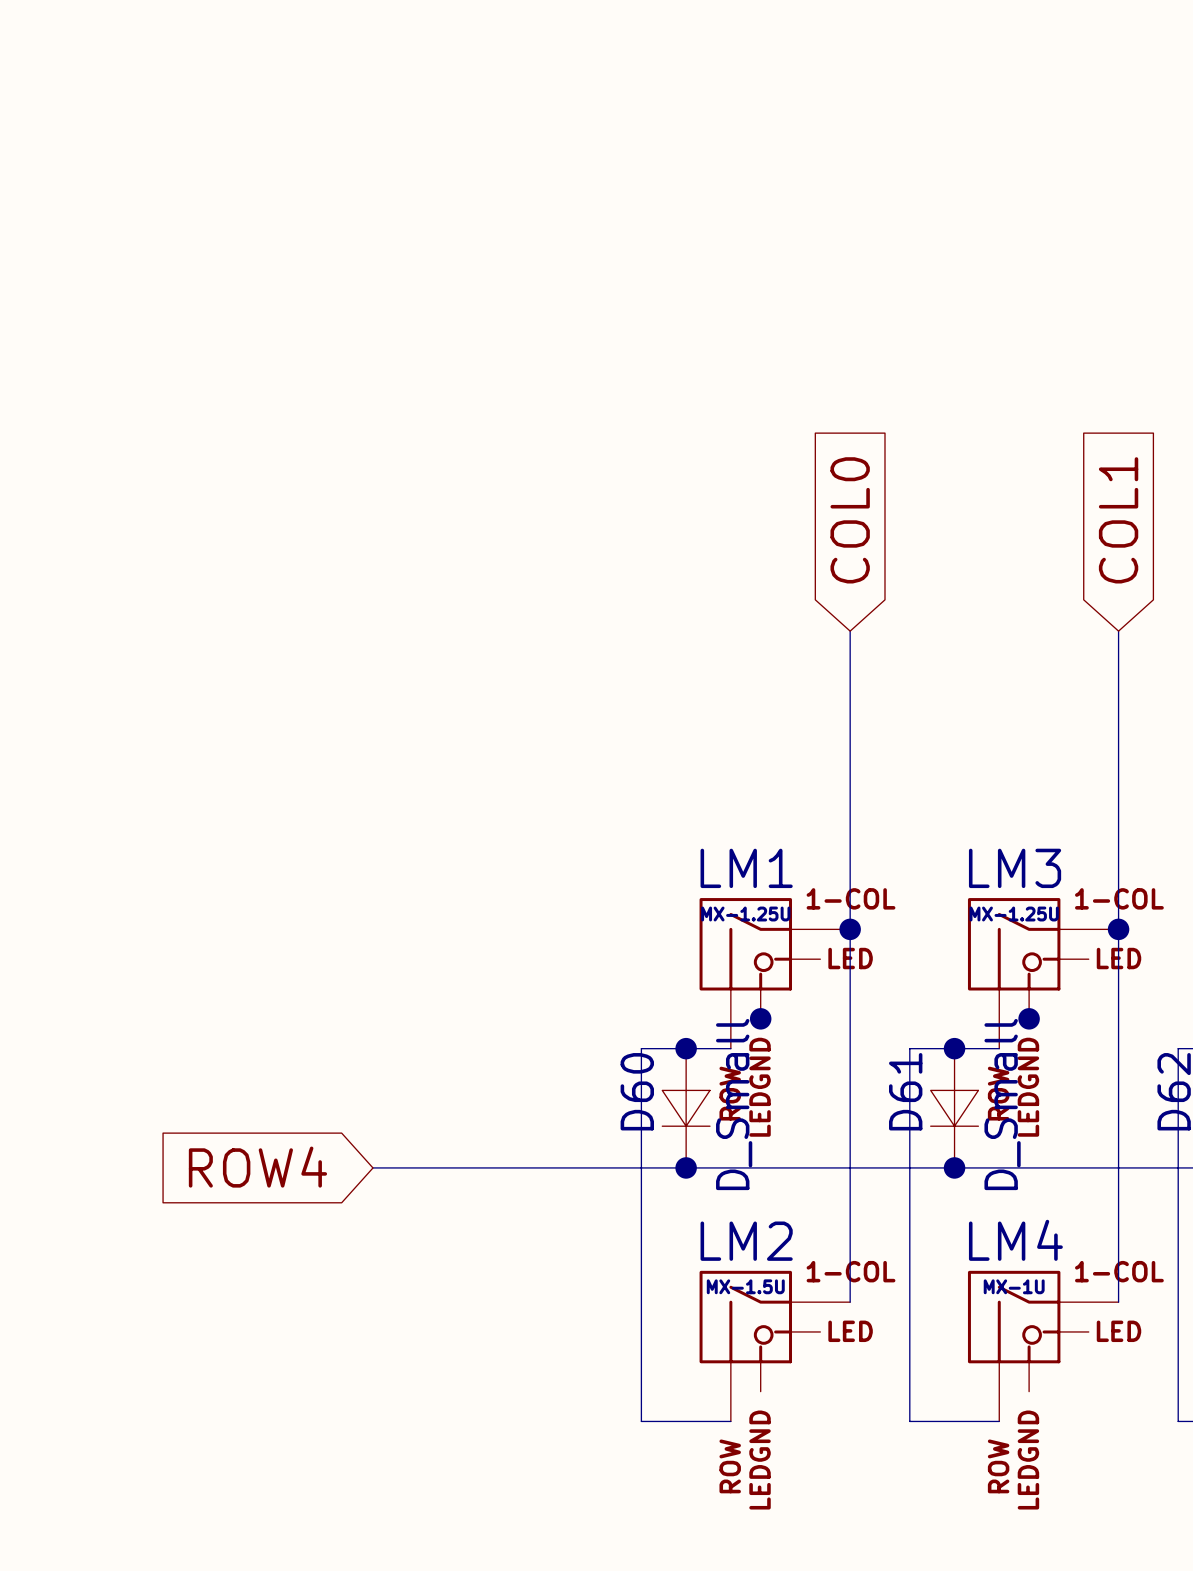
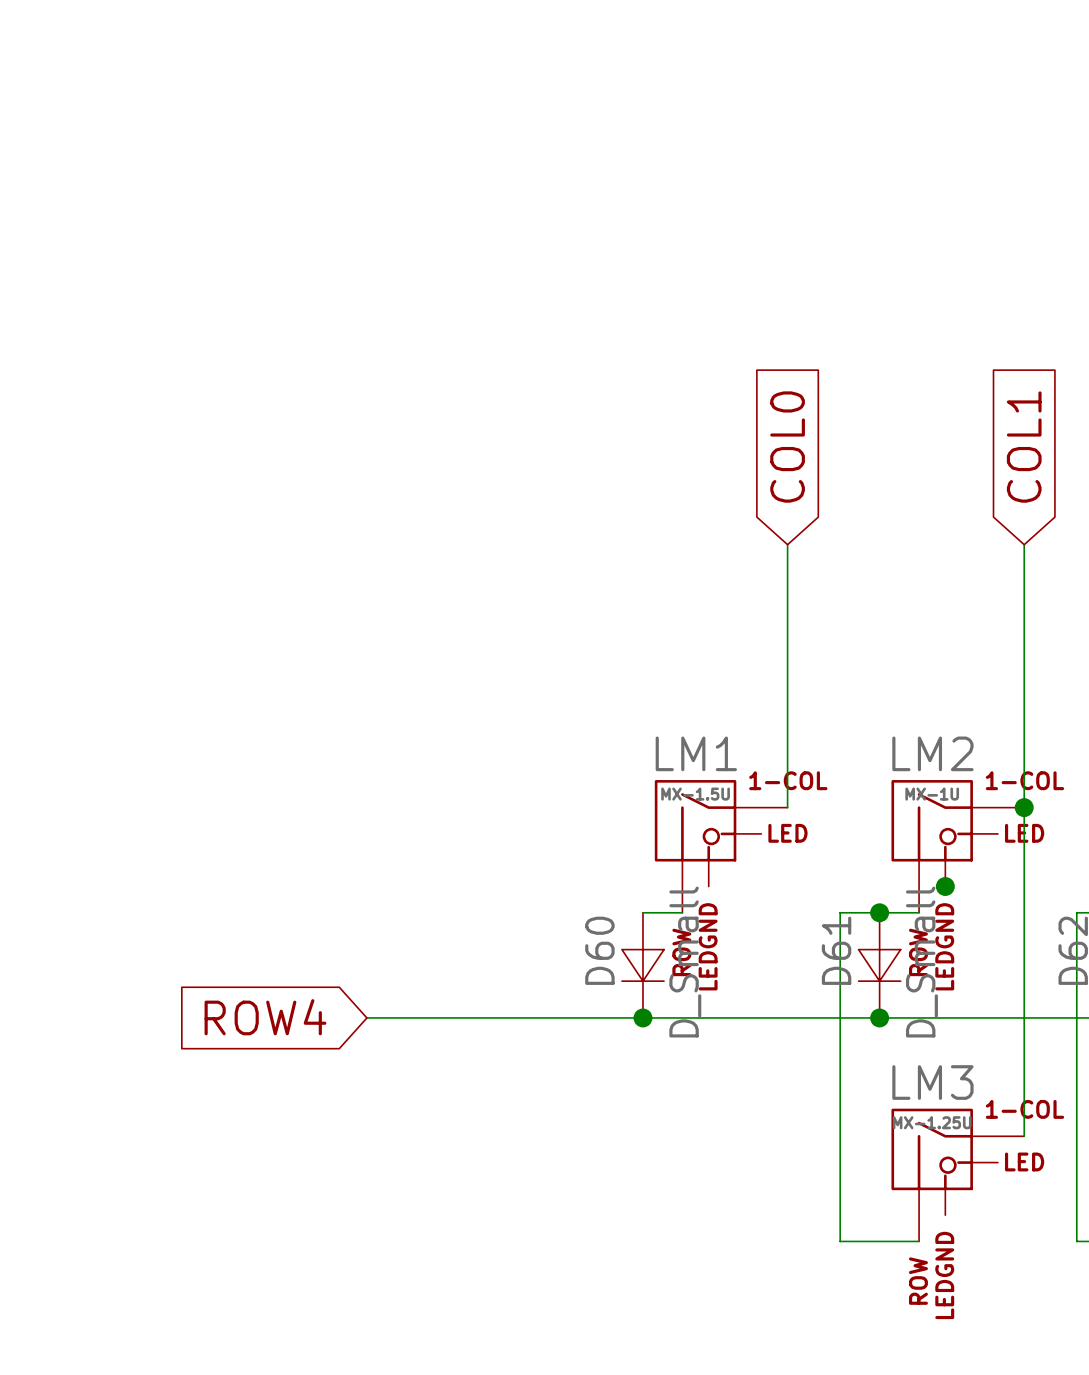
LM3 name: LM3 (1015, 868) -> LM2 (932, 753)
LM1 value: MX-1.25U (745, 914) -> MX-1.5U (695, 794)
LM3 value: MX-1.25U (1014, 914) -> MX-1U (932, 794)
wire: (850, 929) (850, 1302) -> none
junction: (850, 929) -> none
junction: (760, 1018) -> none
wire: (686, 1048) (641, 1048) (641, 1421) (730, 1421) -> none
junction: (686, 1048) -> none
LM4 name: LM4 (1015, 1240) -> LM3 (932, 1082)
LM4 value: MX-1U (1014, 1286) -> MX-1.25U (932, 1122)
LM2: MX-1.5U (774, 1346) -> none

